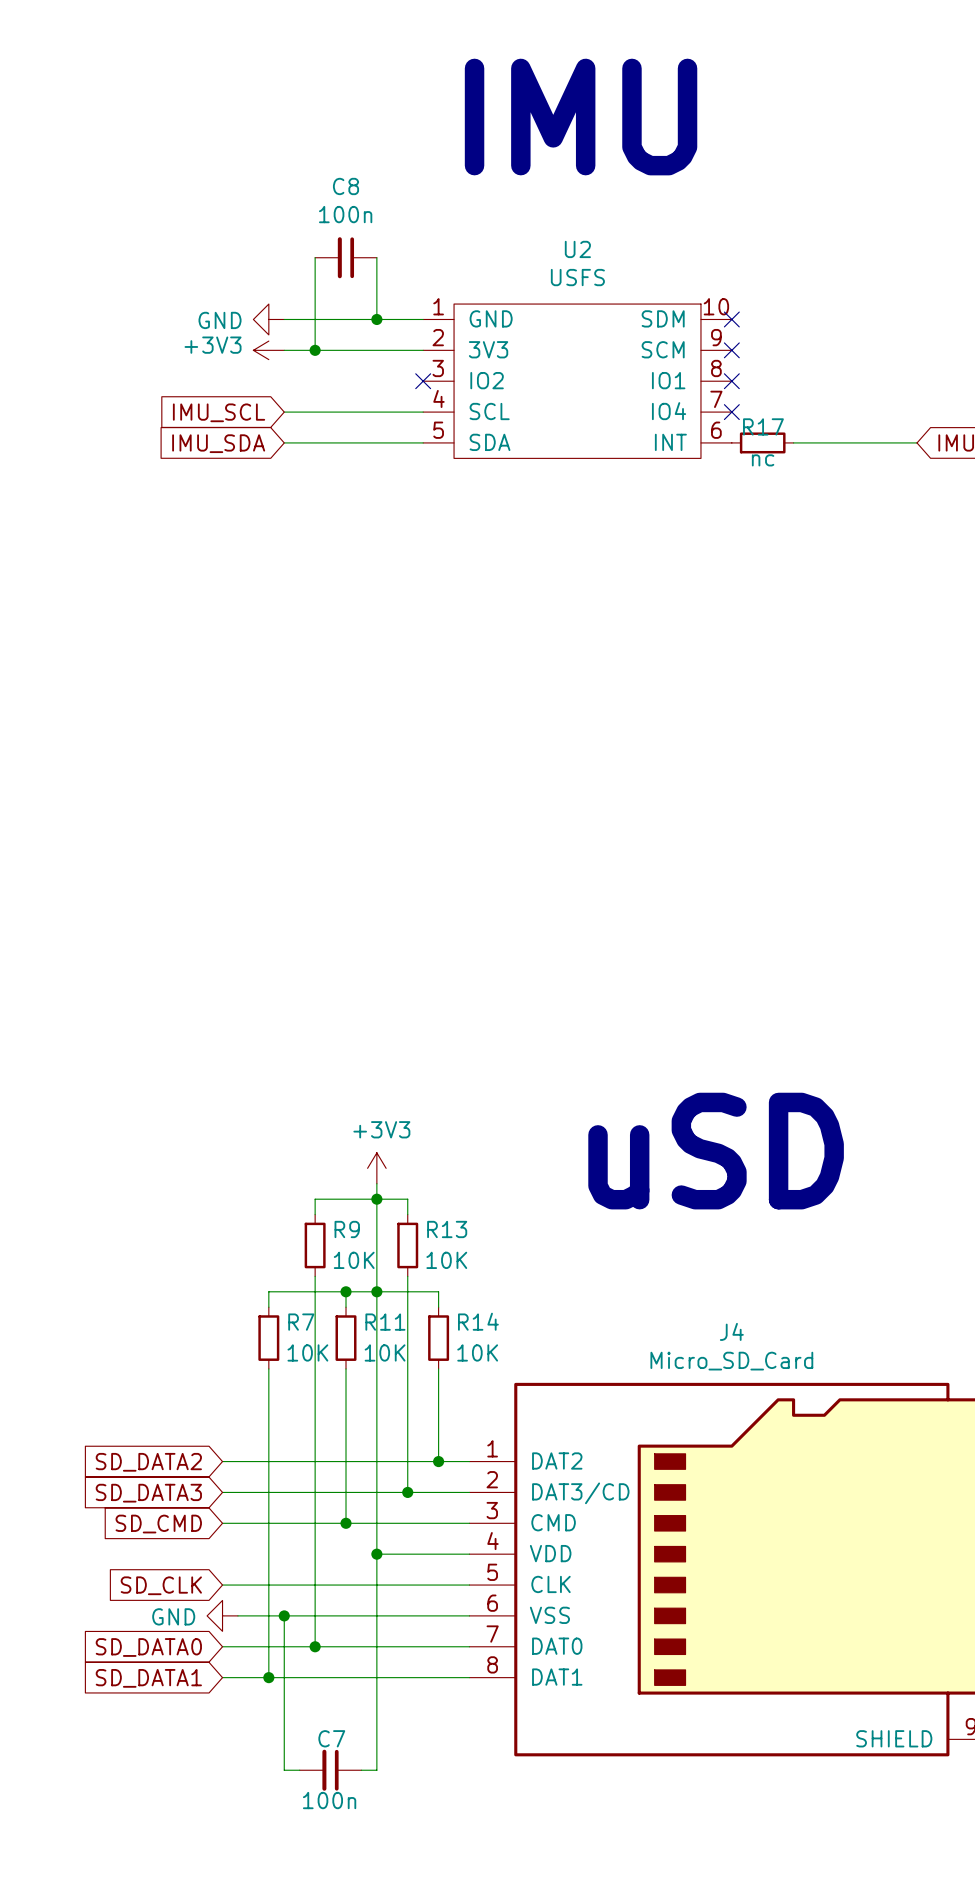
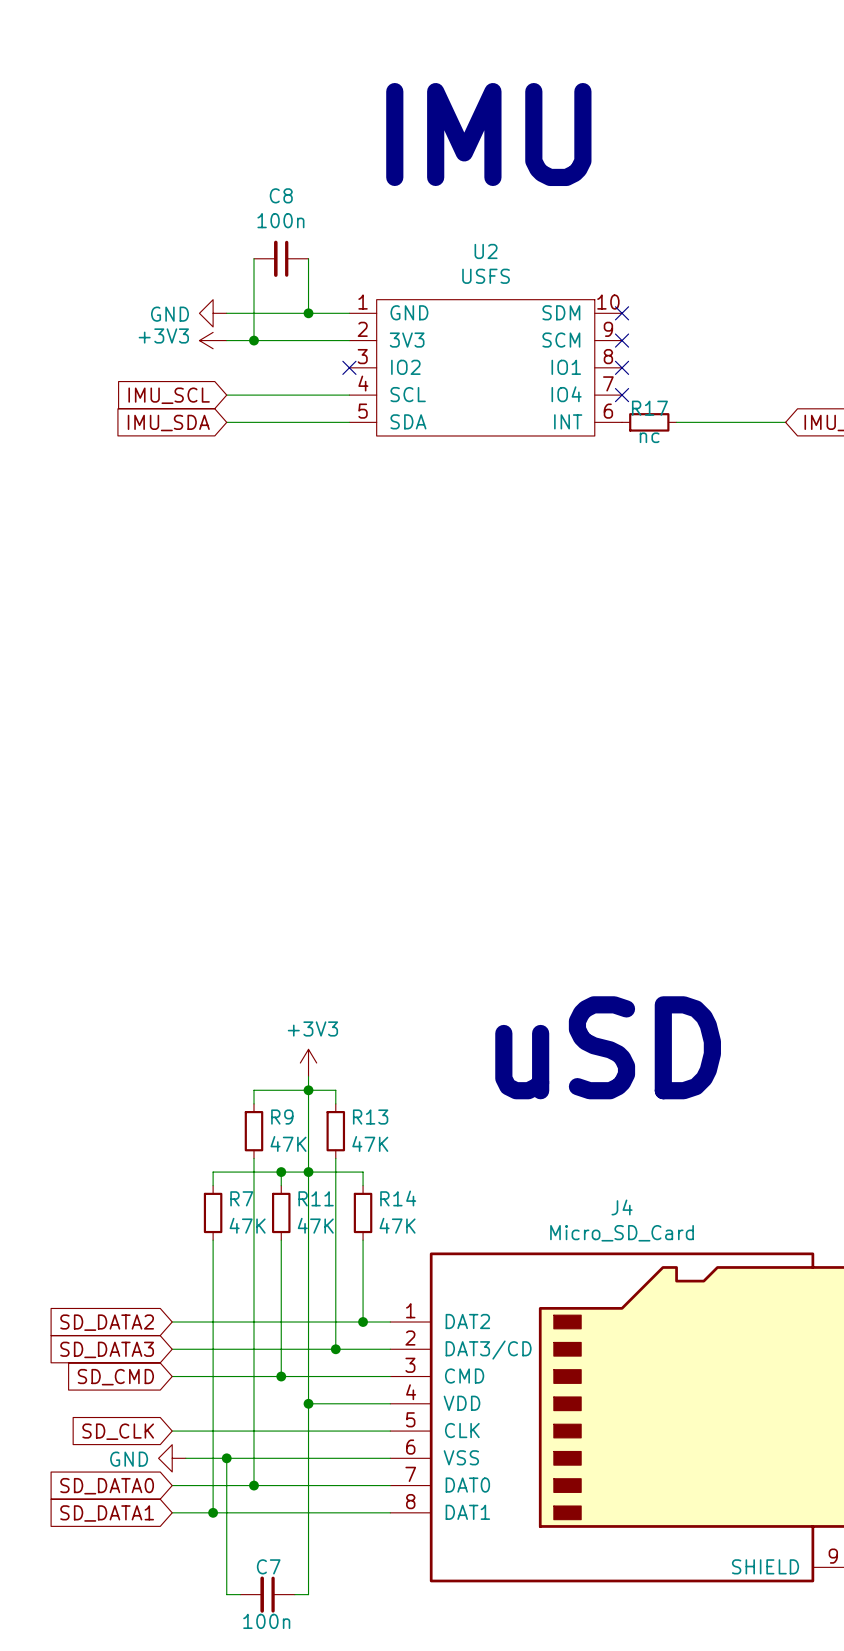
R9 value: 10K (354, 1260) -> 47K (288, 1143)
R13 value: 10K (446, 1260) -> 47K (370, 1143)
R7 value: 10K (307, 1352) -> 47K (247, 1225)
R11 value: 10K (385, 1352) -> 47K (315, 1225)
R14 value: 10K (477, 1352) -> 47K (397, 1225)

